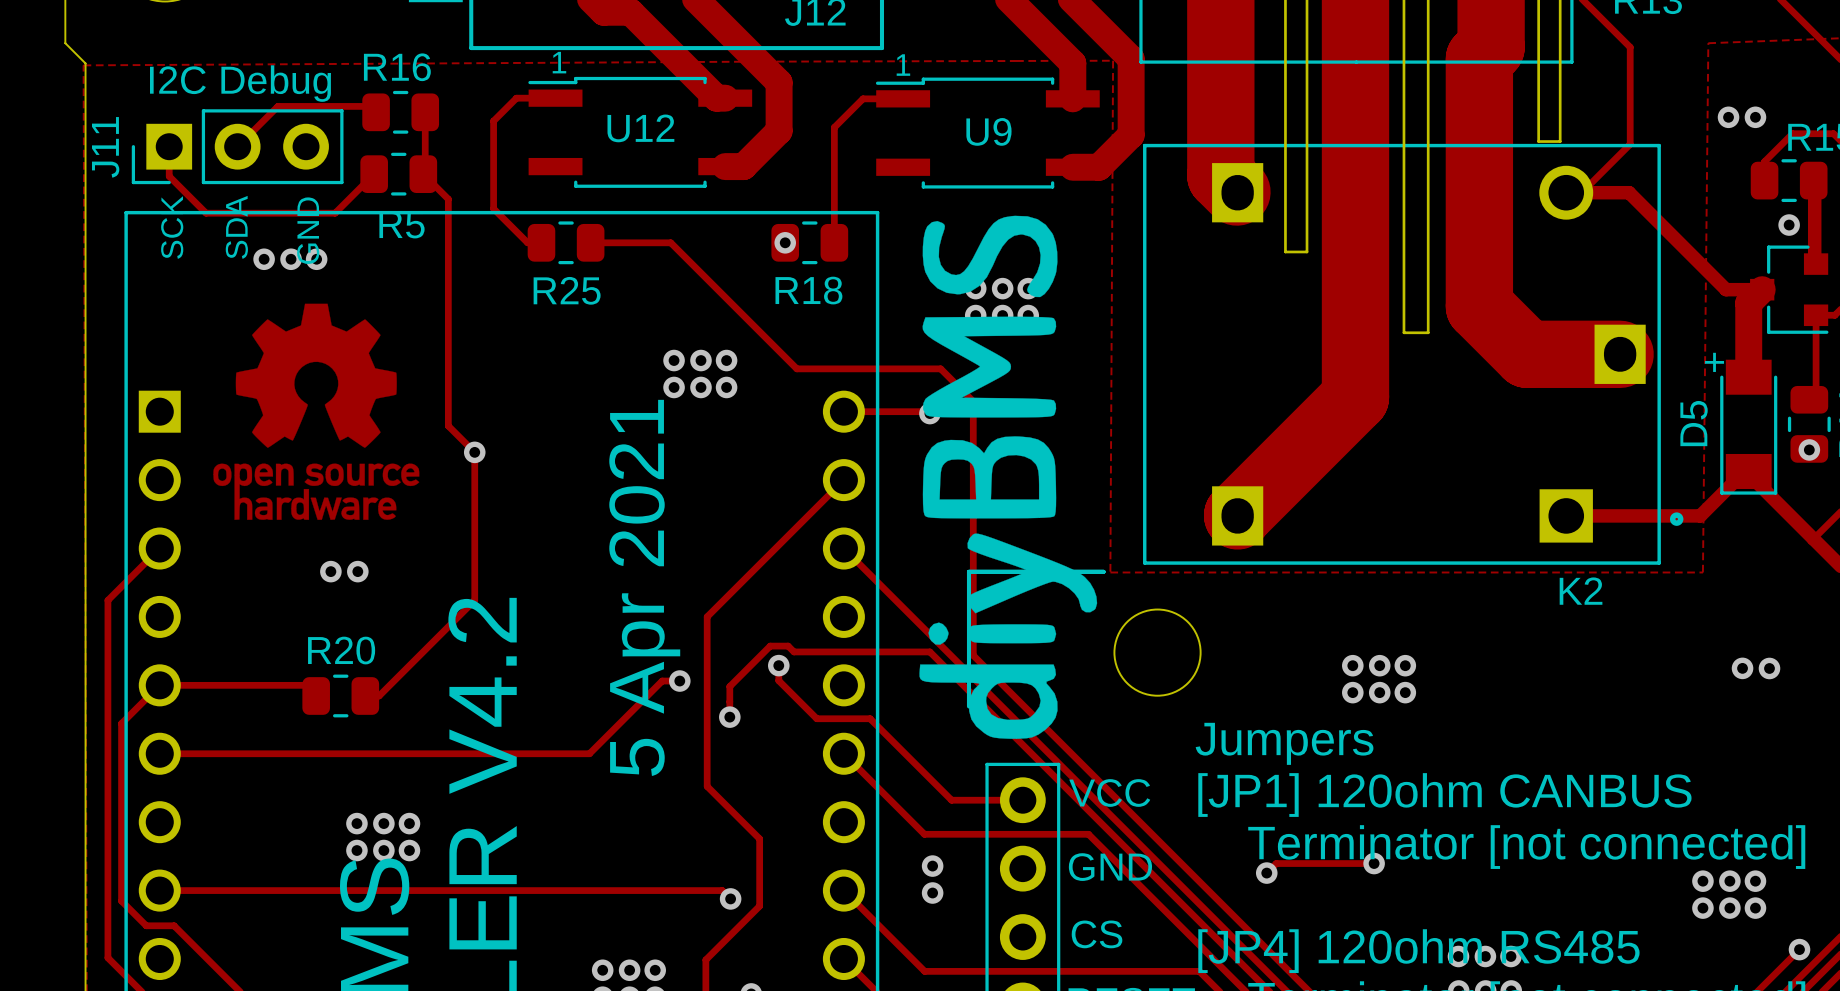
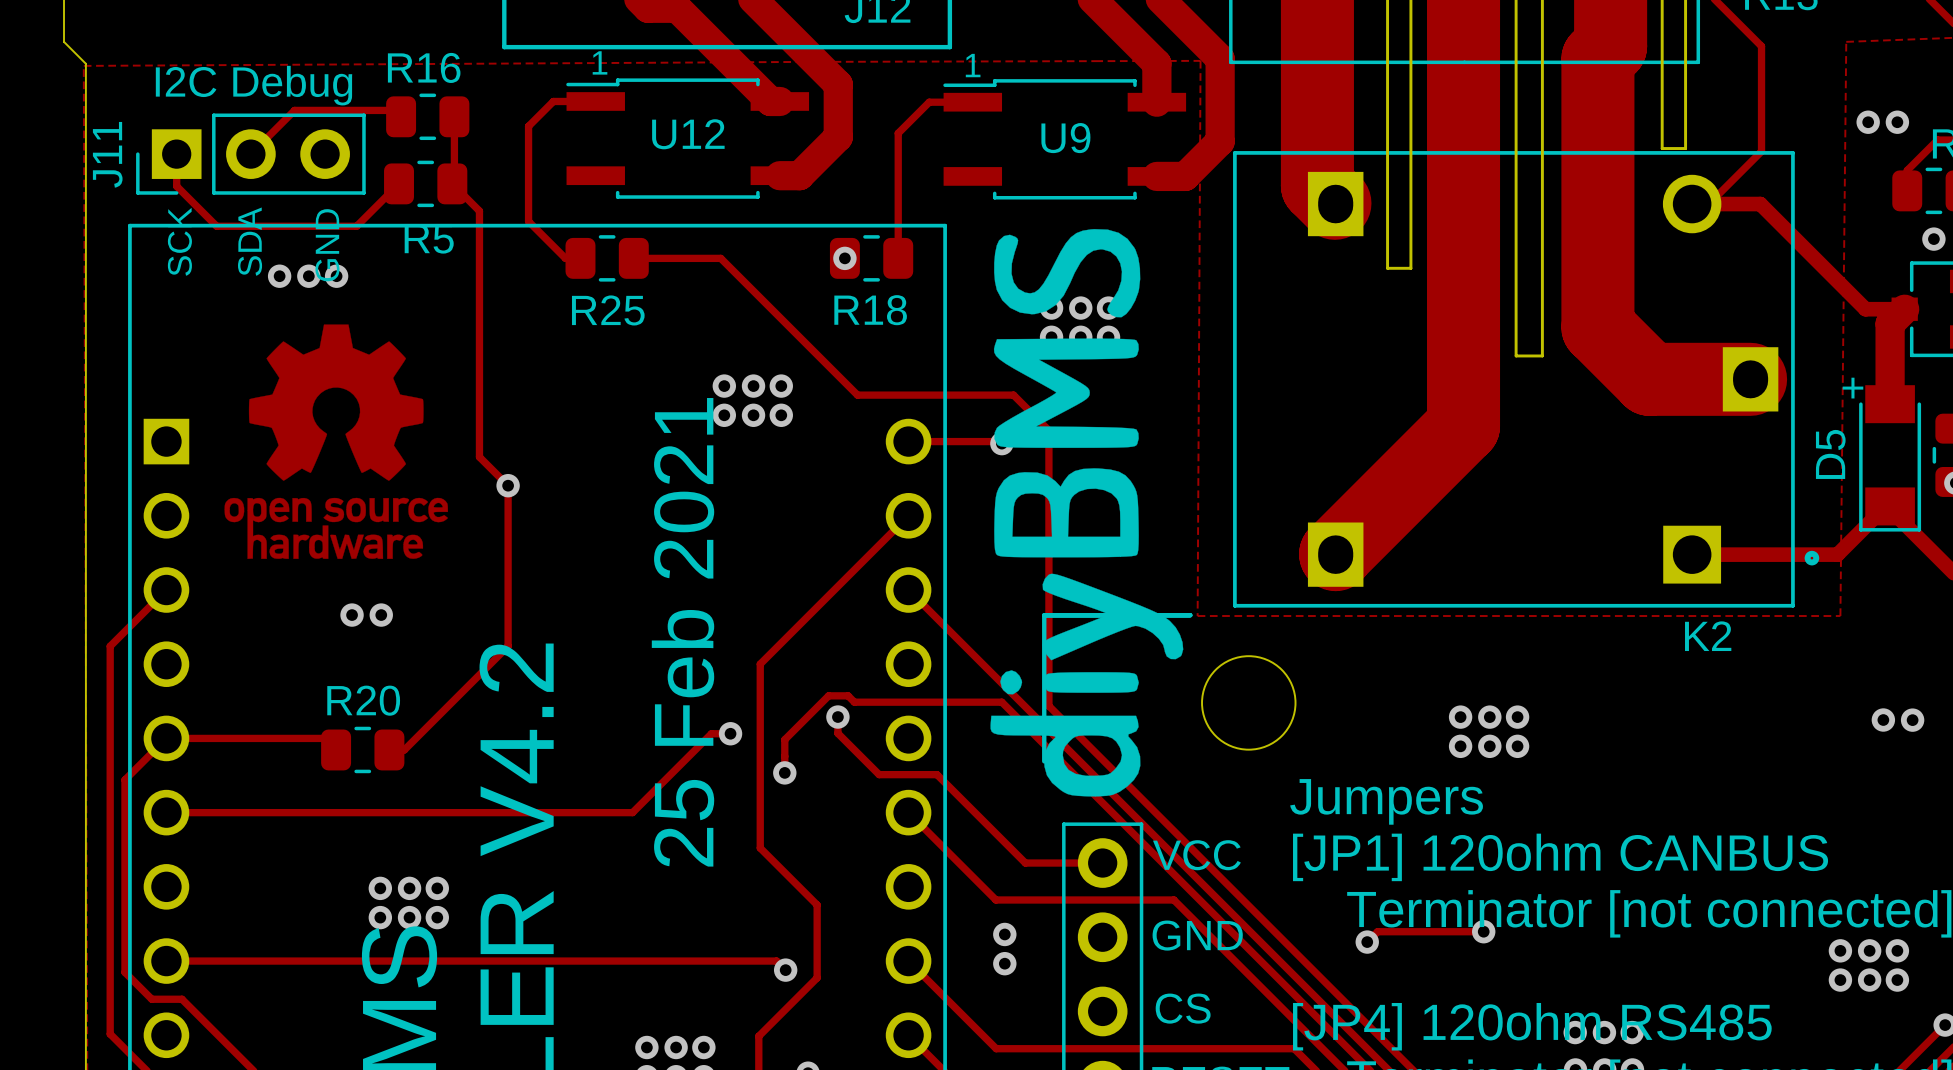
text: 5 Apr 2021 (644, 587) -> 25 Feb 2021 (683, 632)

